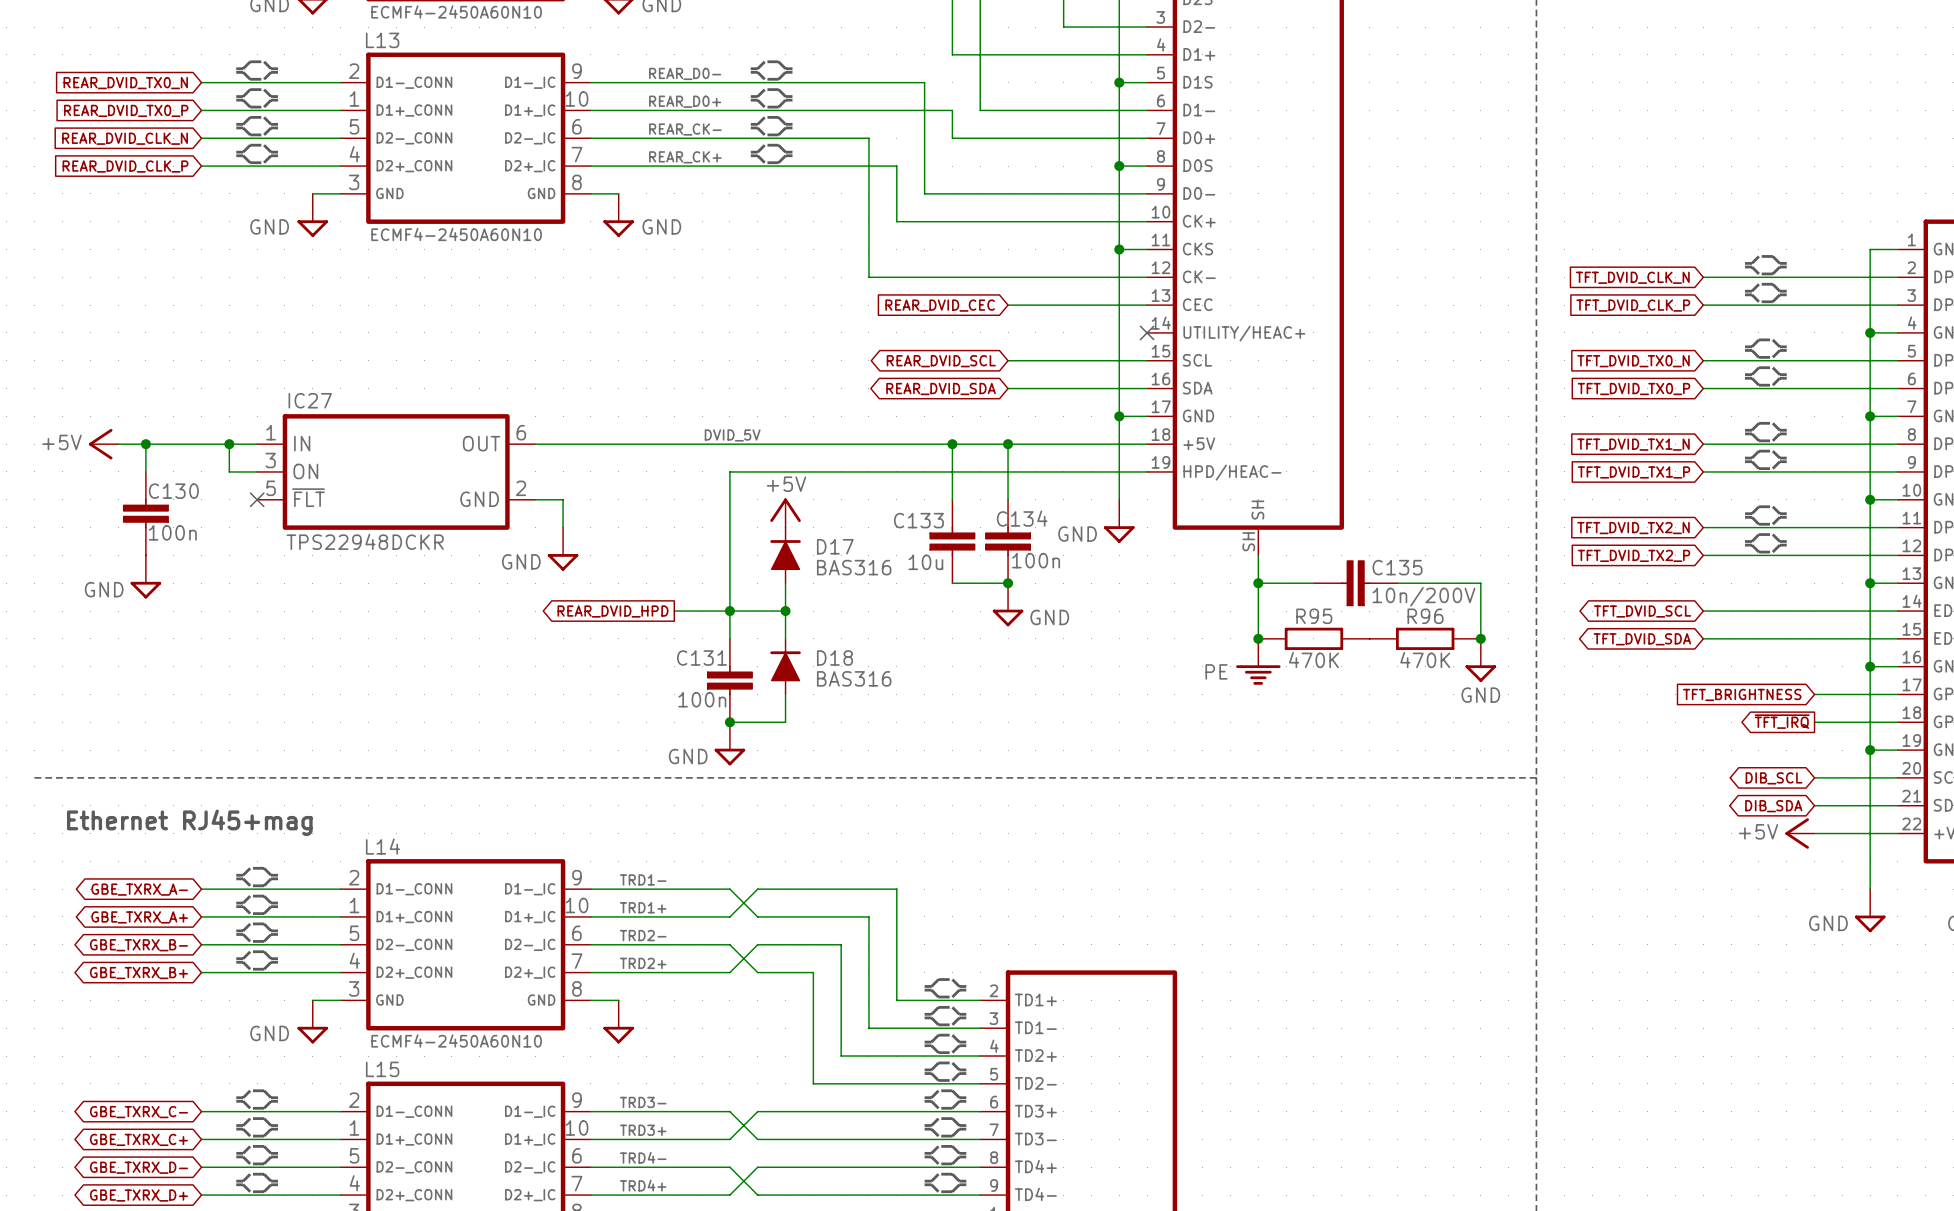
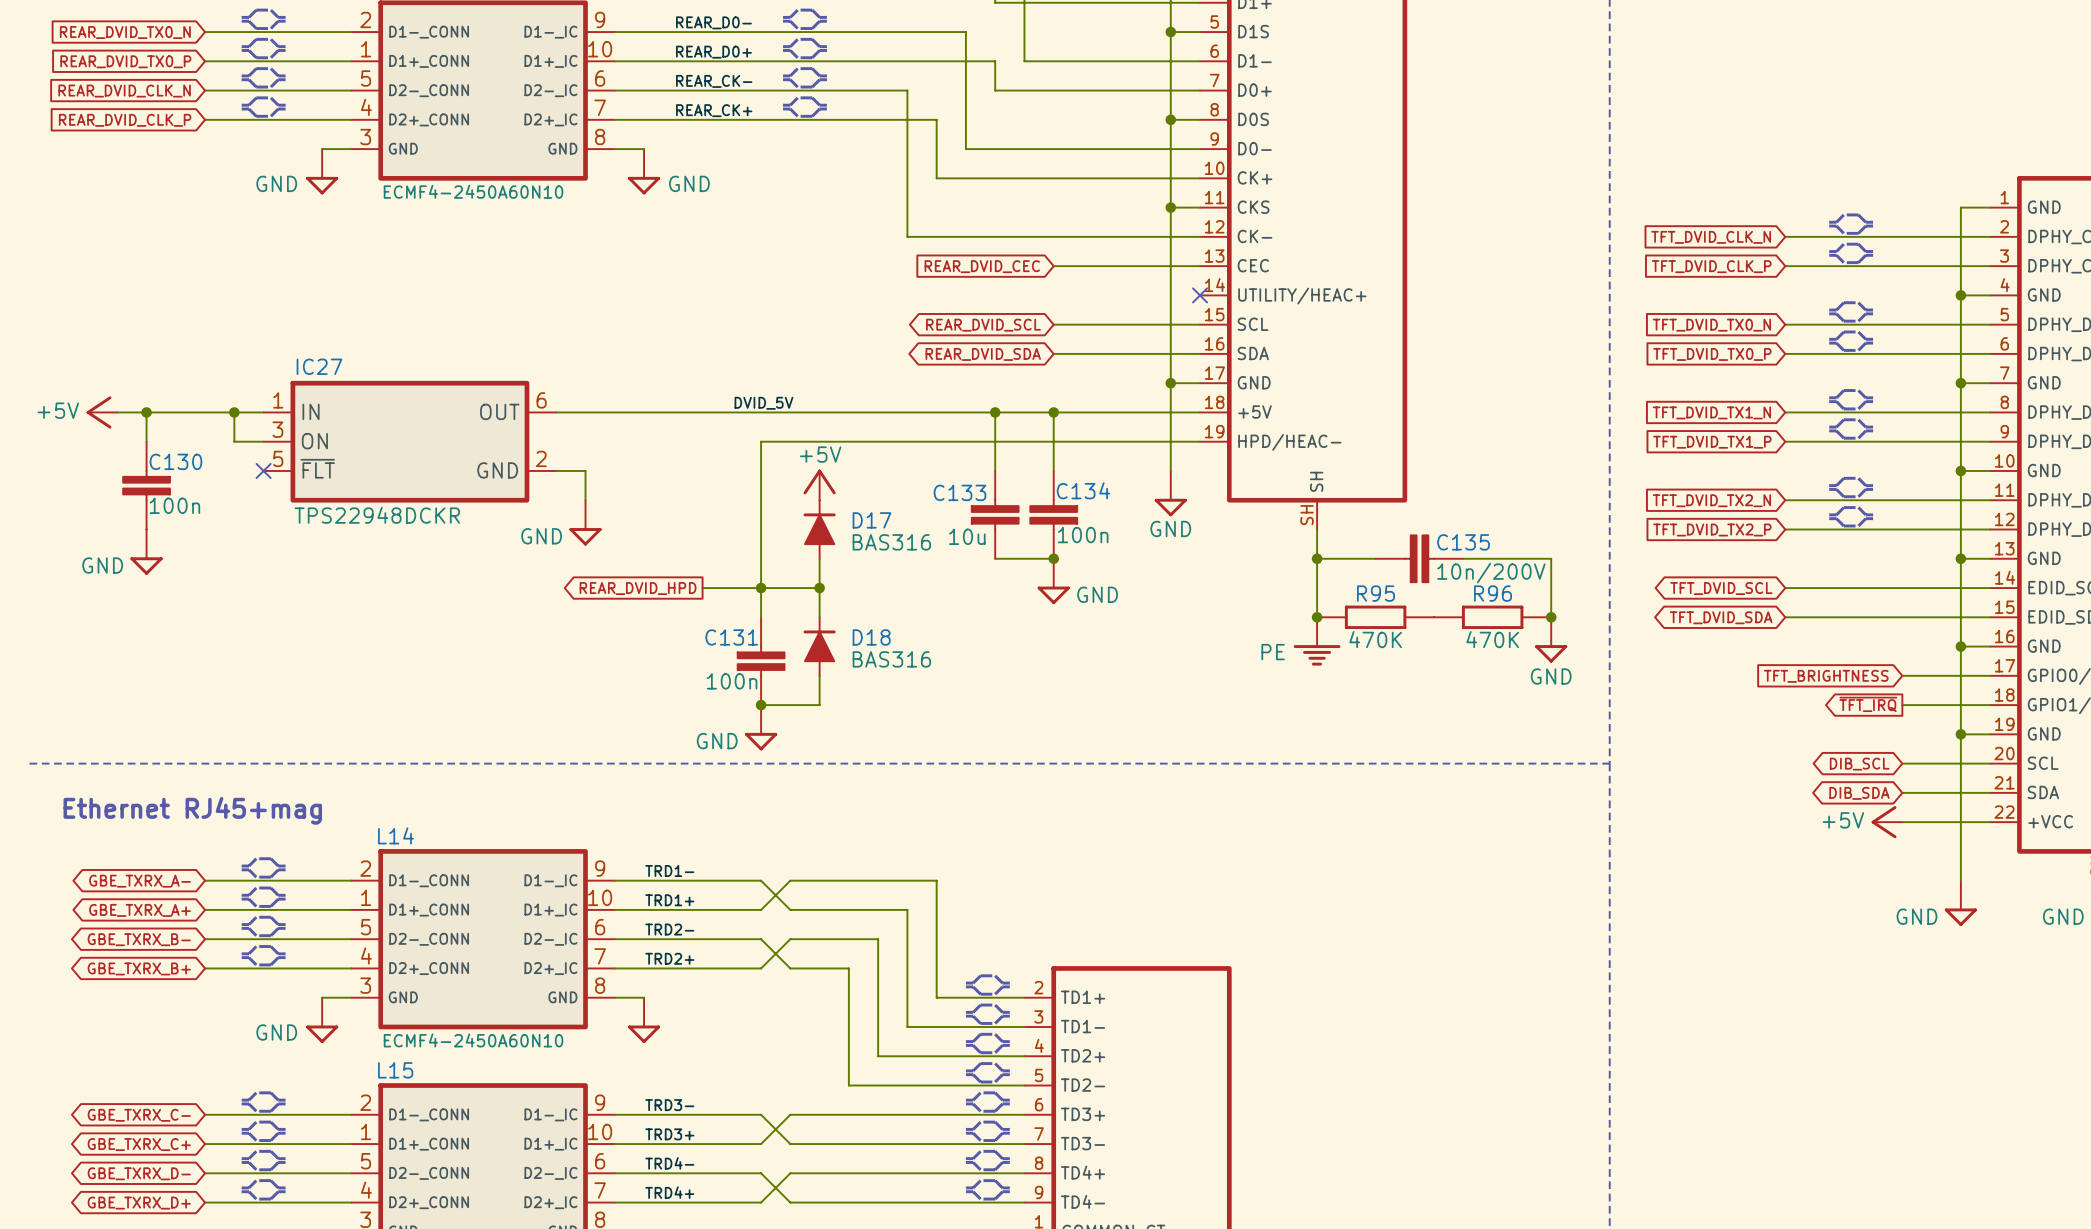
C134 name position: C134 (1022, 518) -> C134 (1083, 490)
power symbol text position: GND (1077, 534) -> GND (1170, 528)

